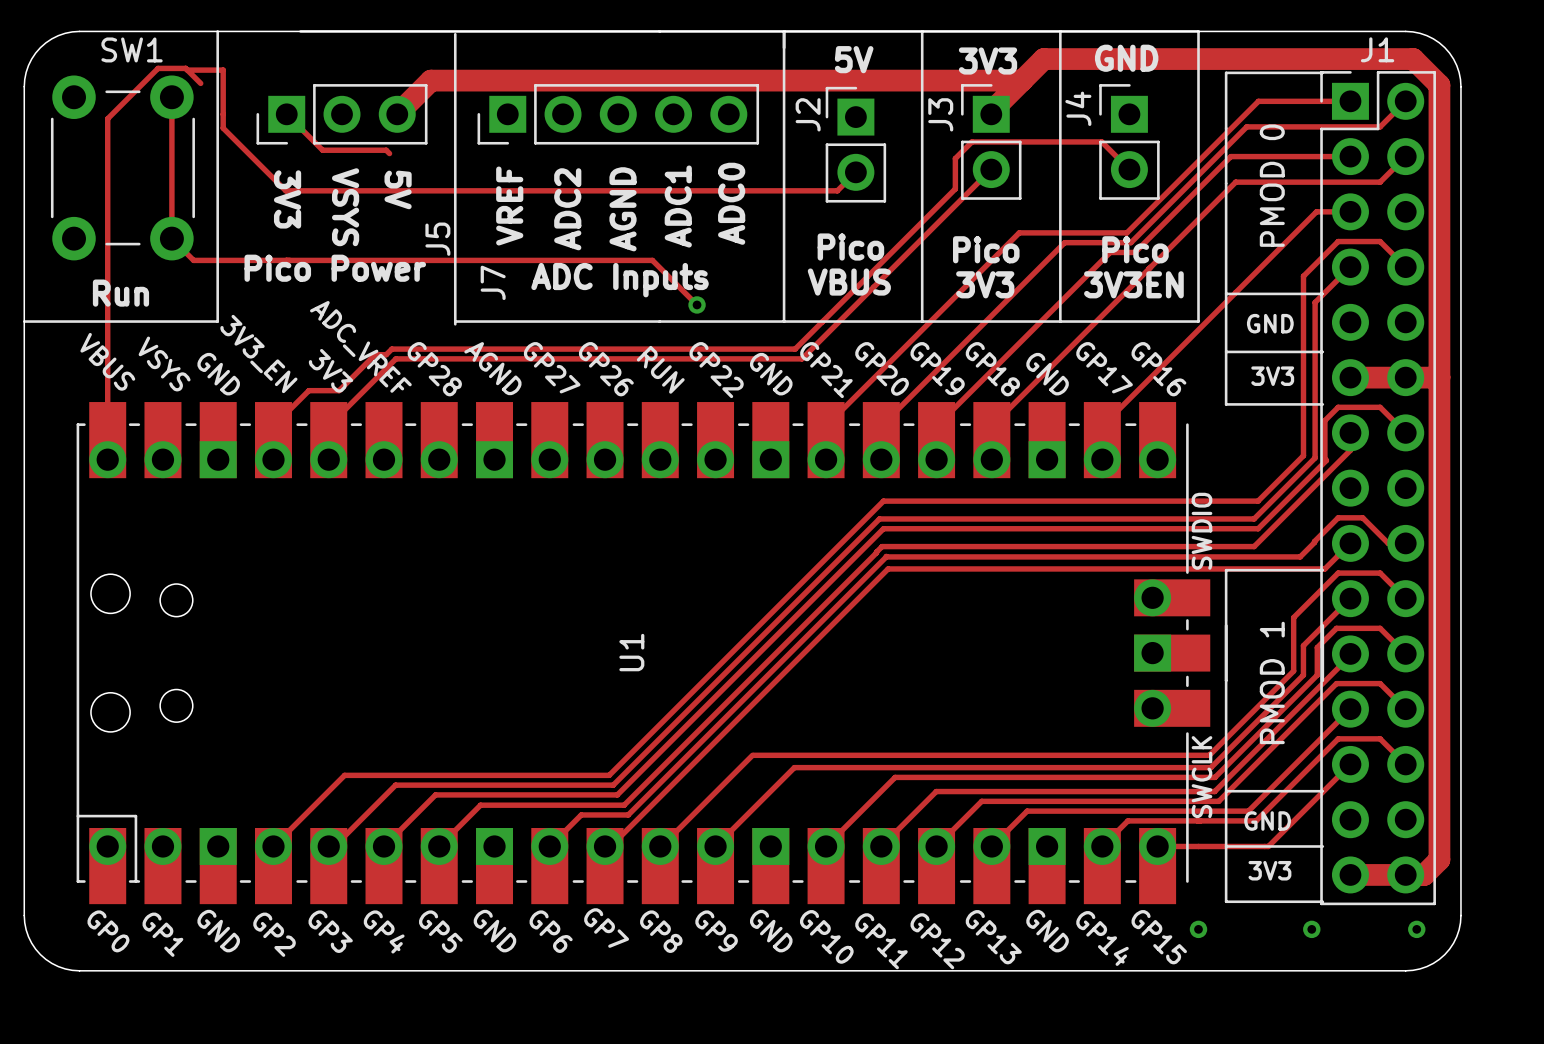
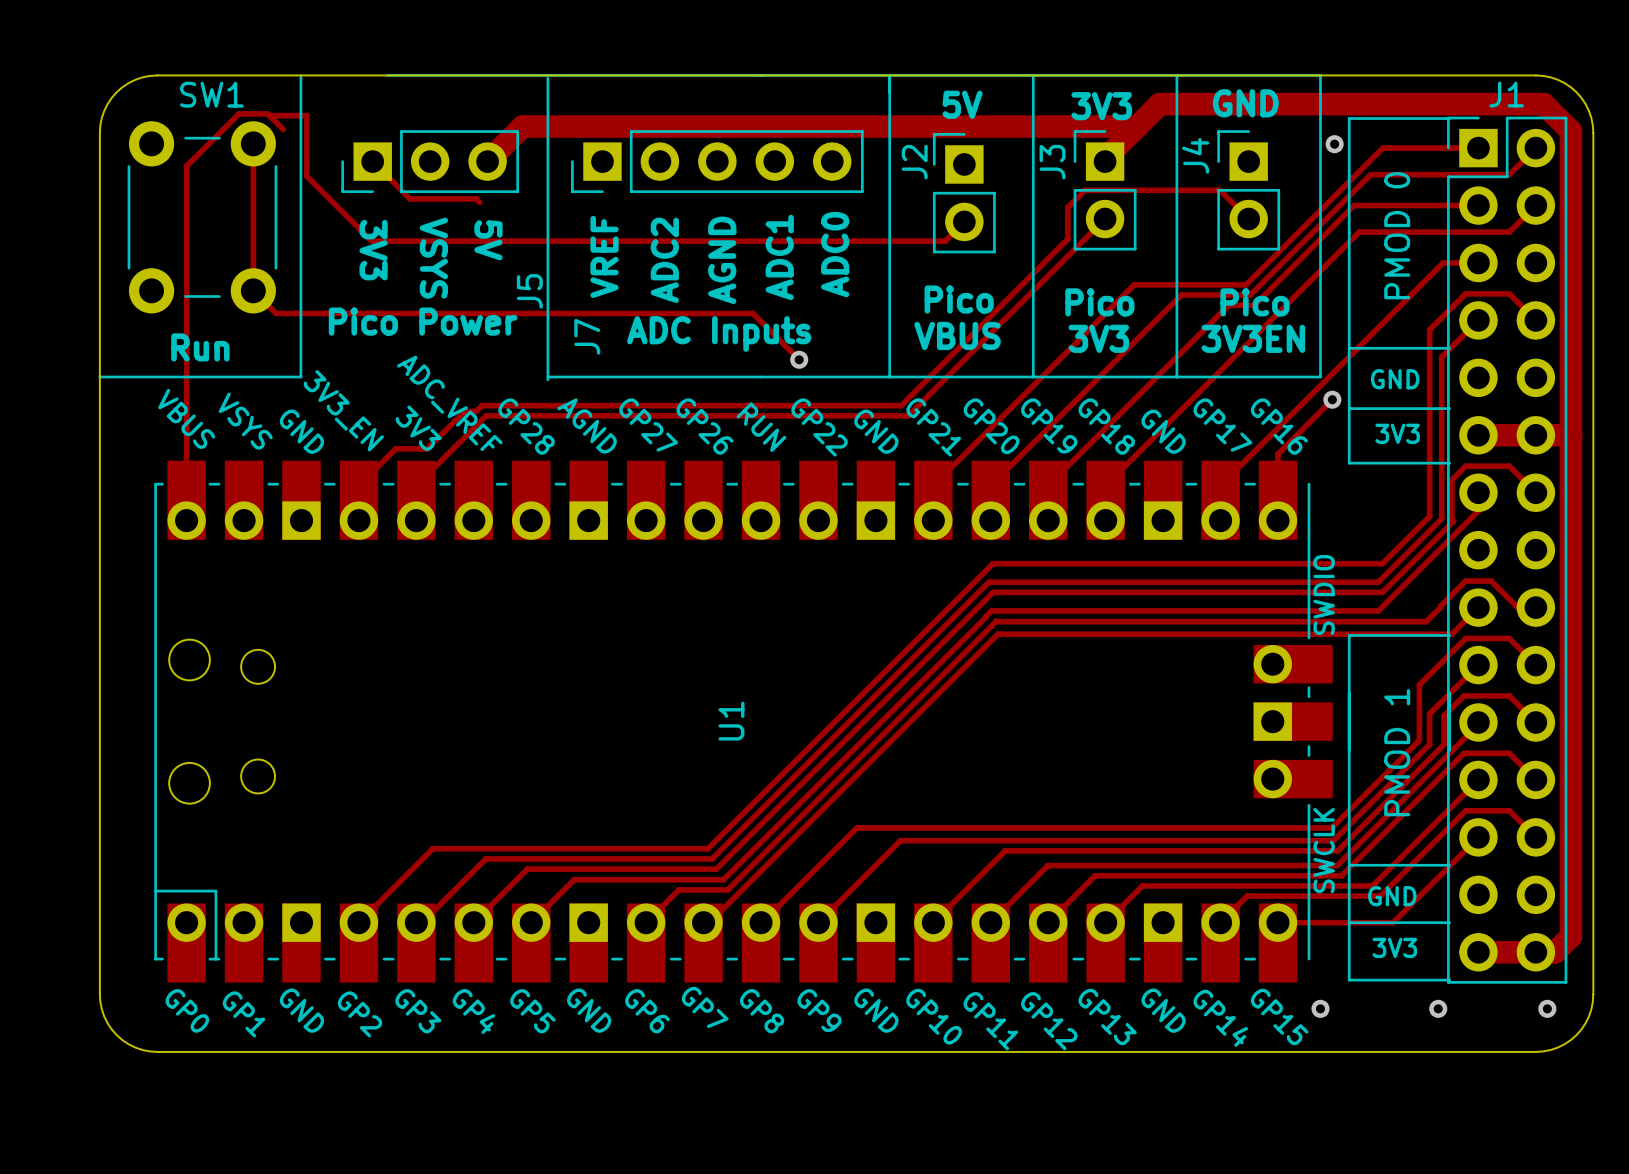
via: none -> (1334, 144)
track: none -> (1332, 399) (1277, 454) (1277, 520)
via: none -> (1332, 399)

